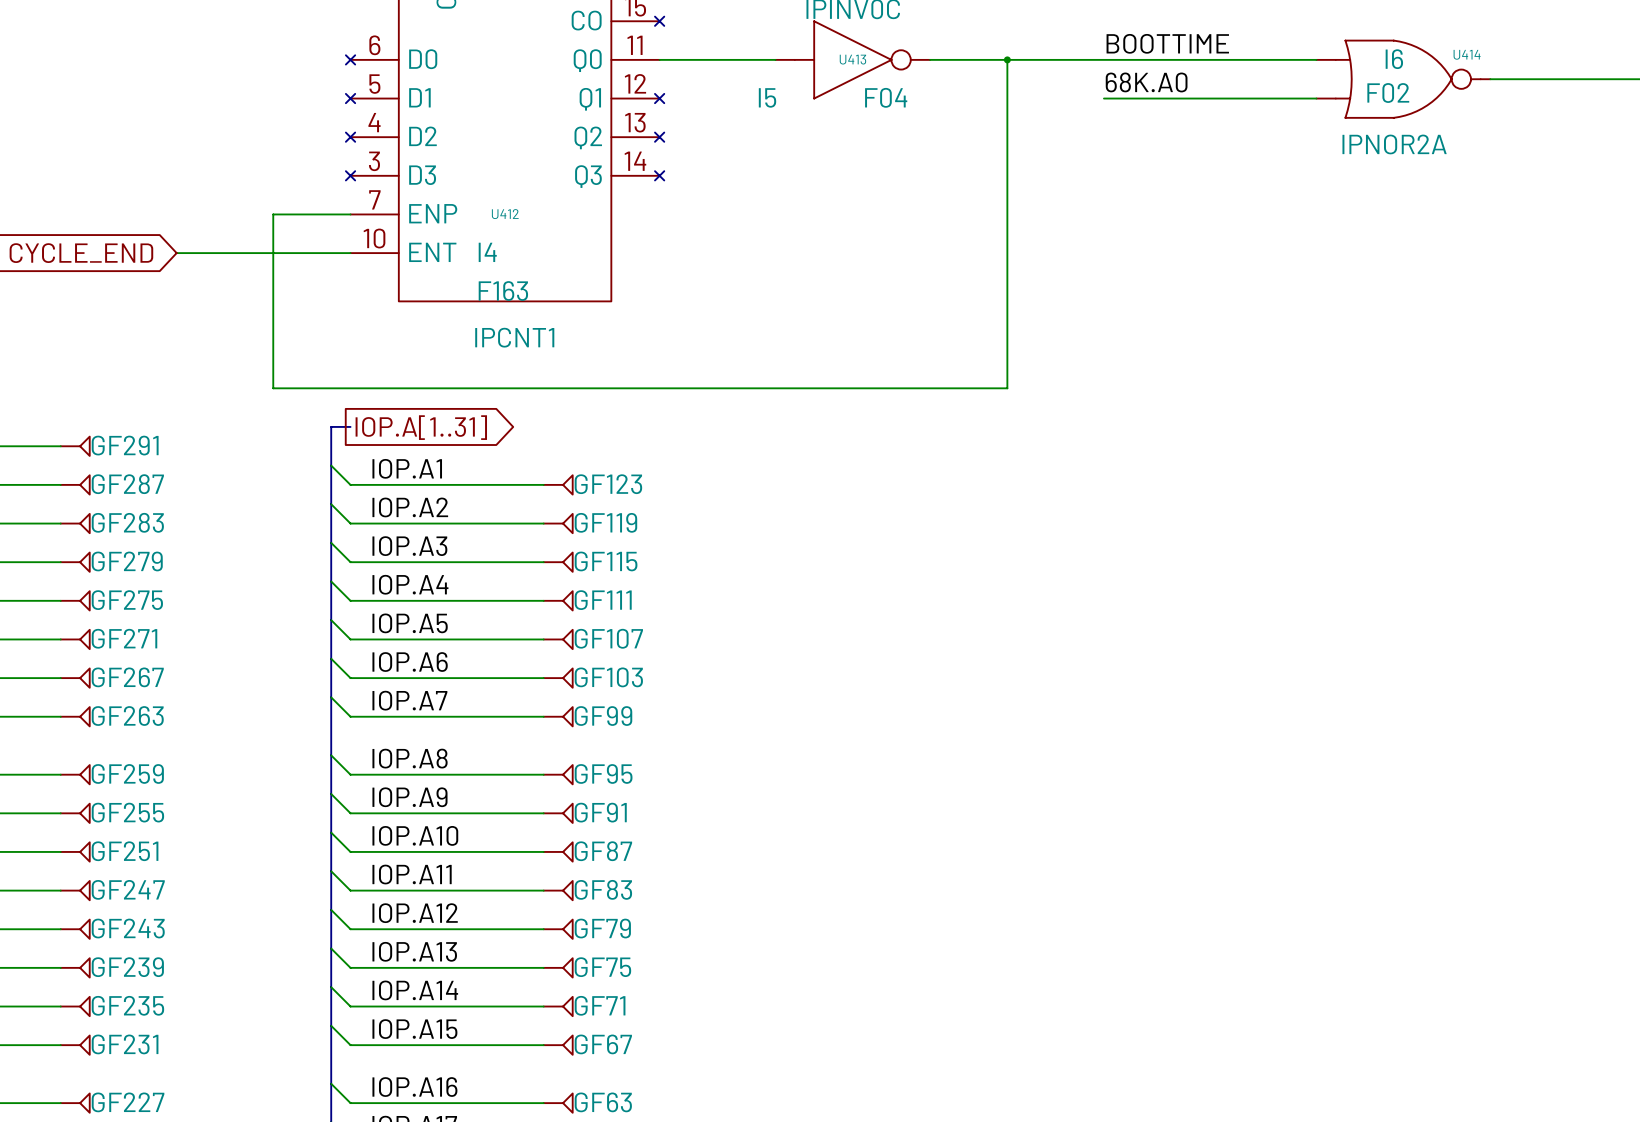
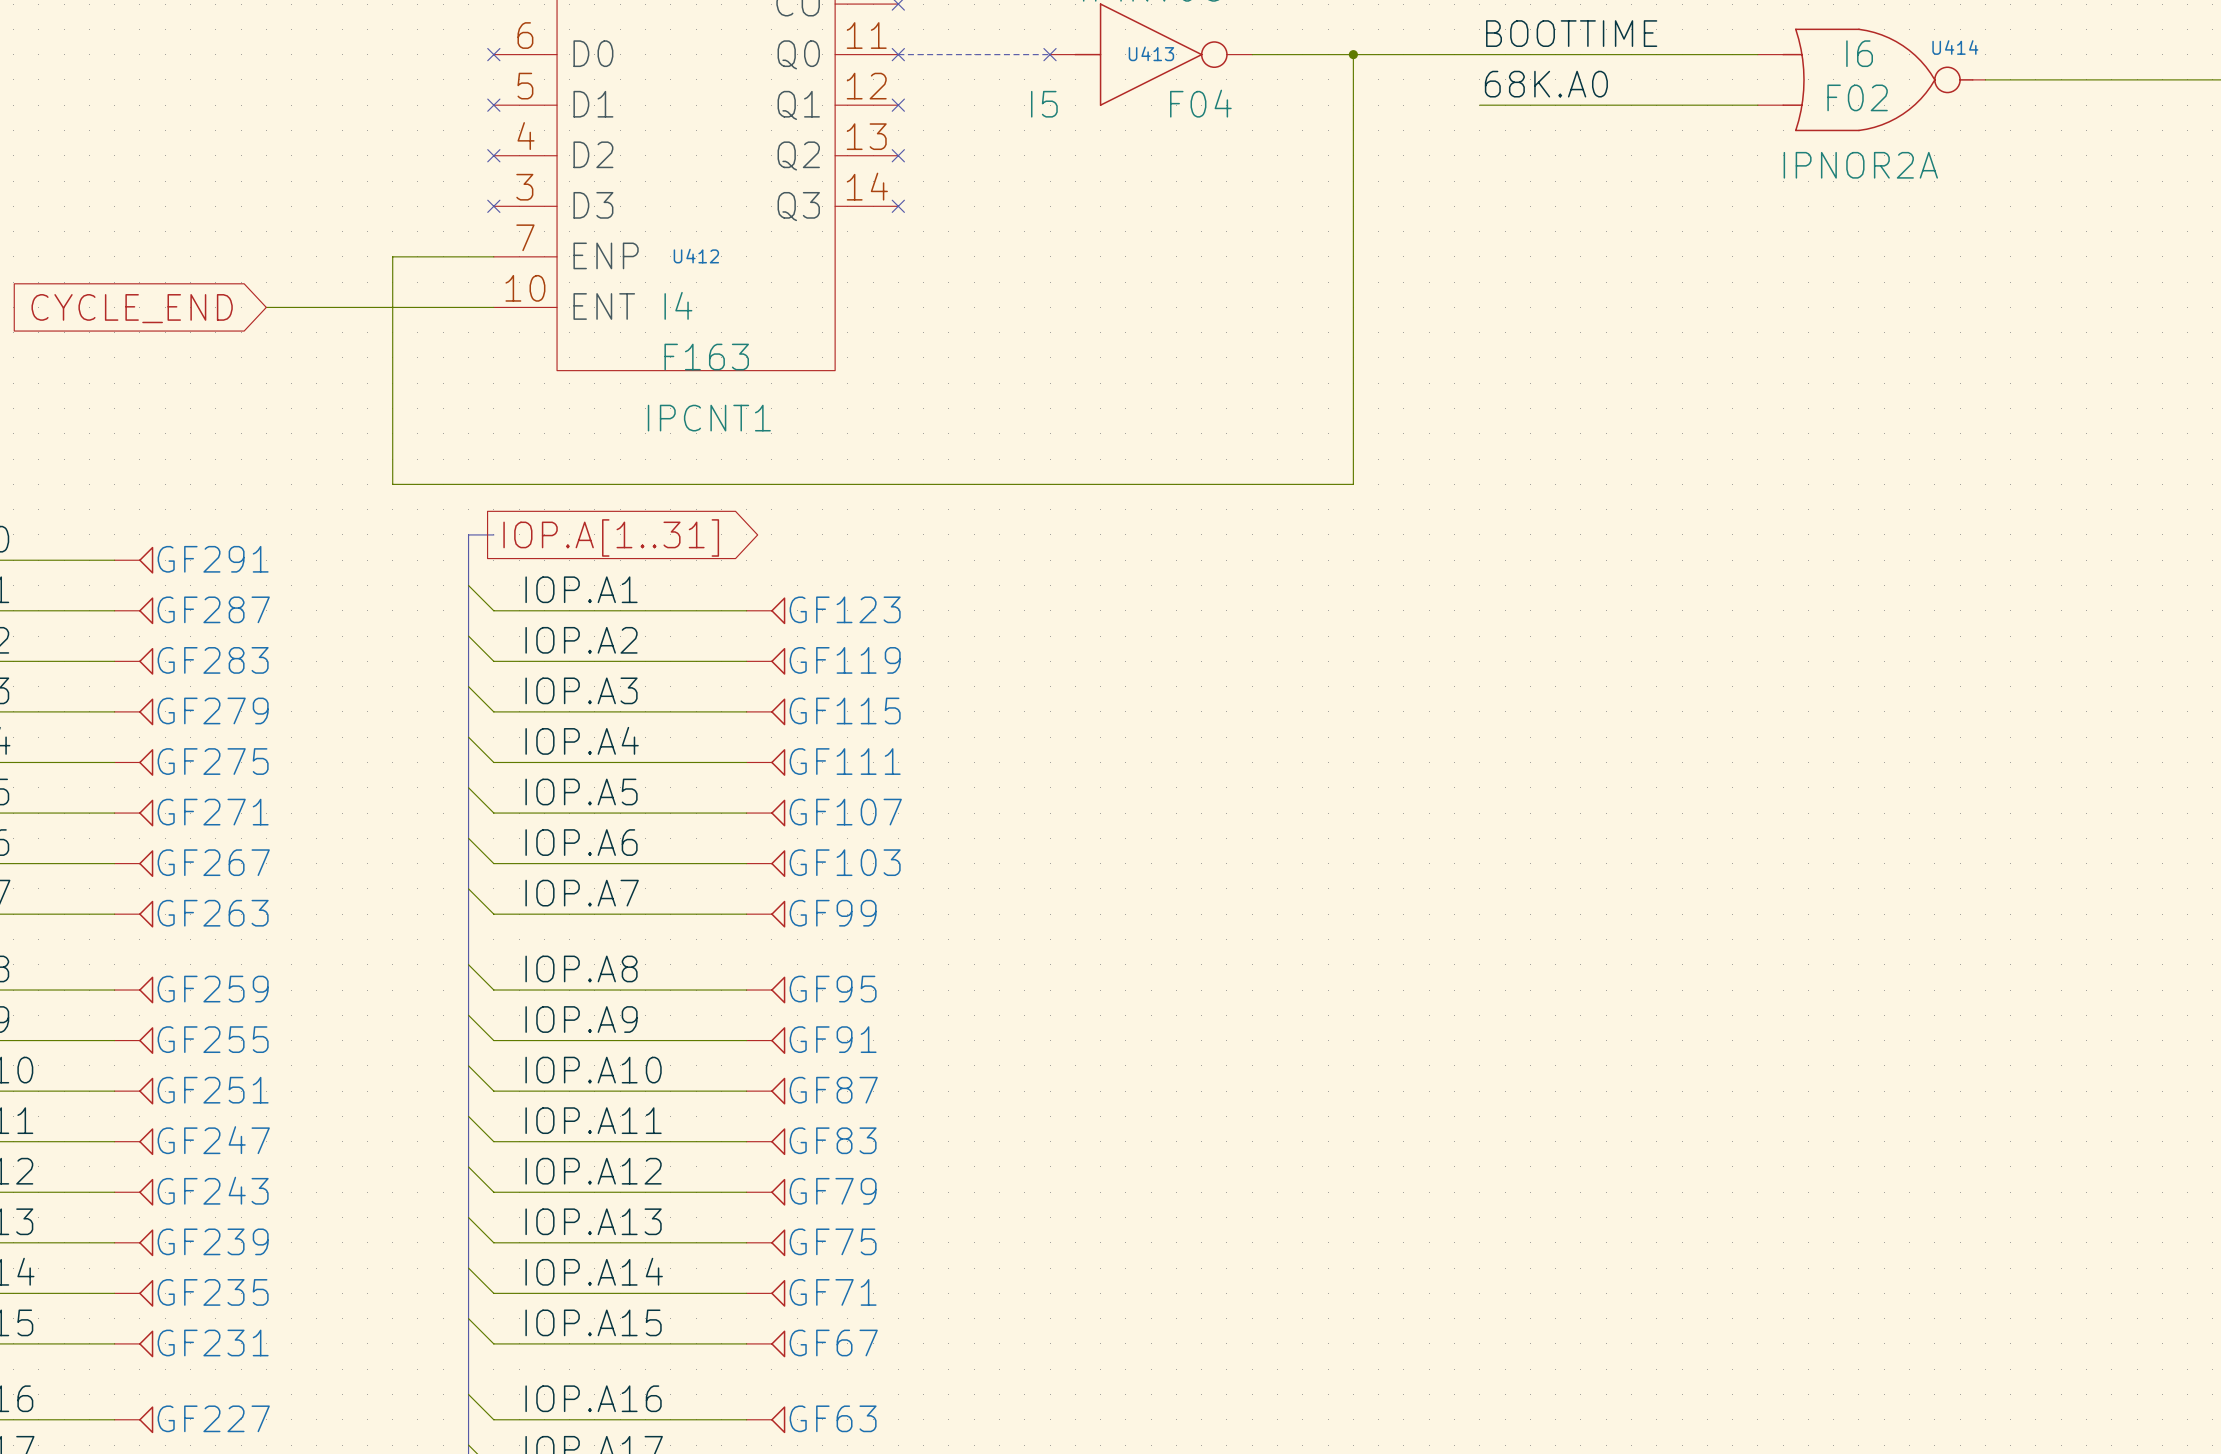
line: none -> (898, 54) (1050, 54)
no-connect mark: none -> (898, 54)
no-connect mark: none -> (1050, 54)

